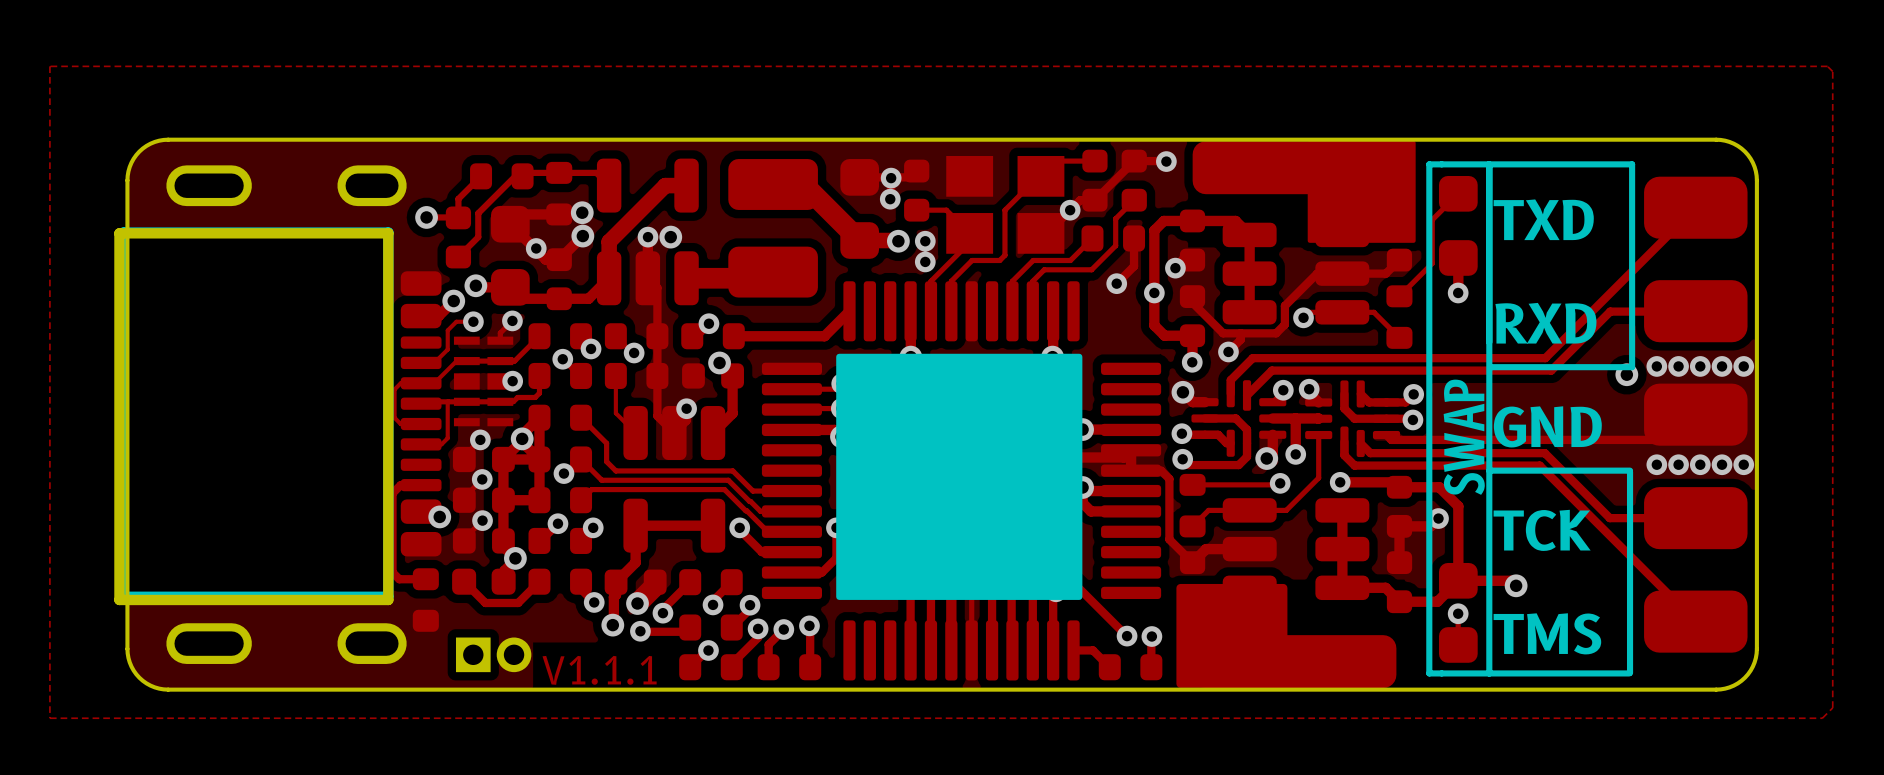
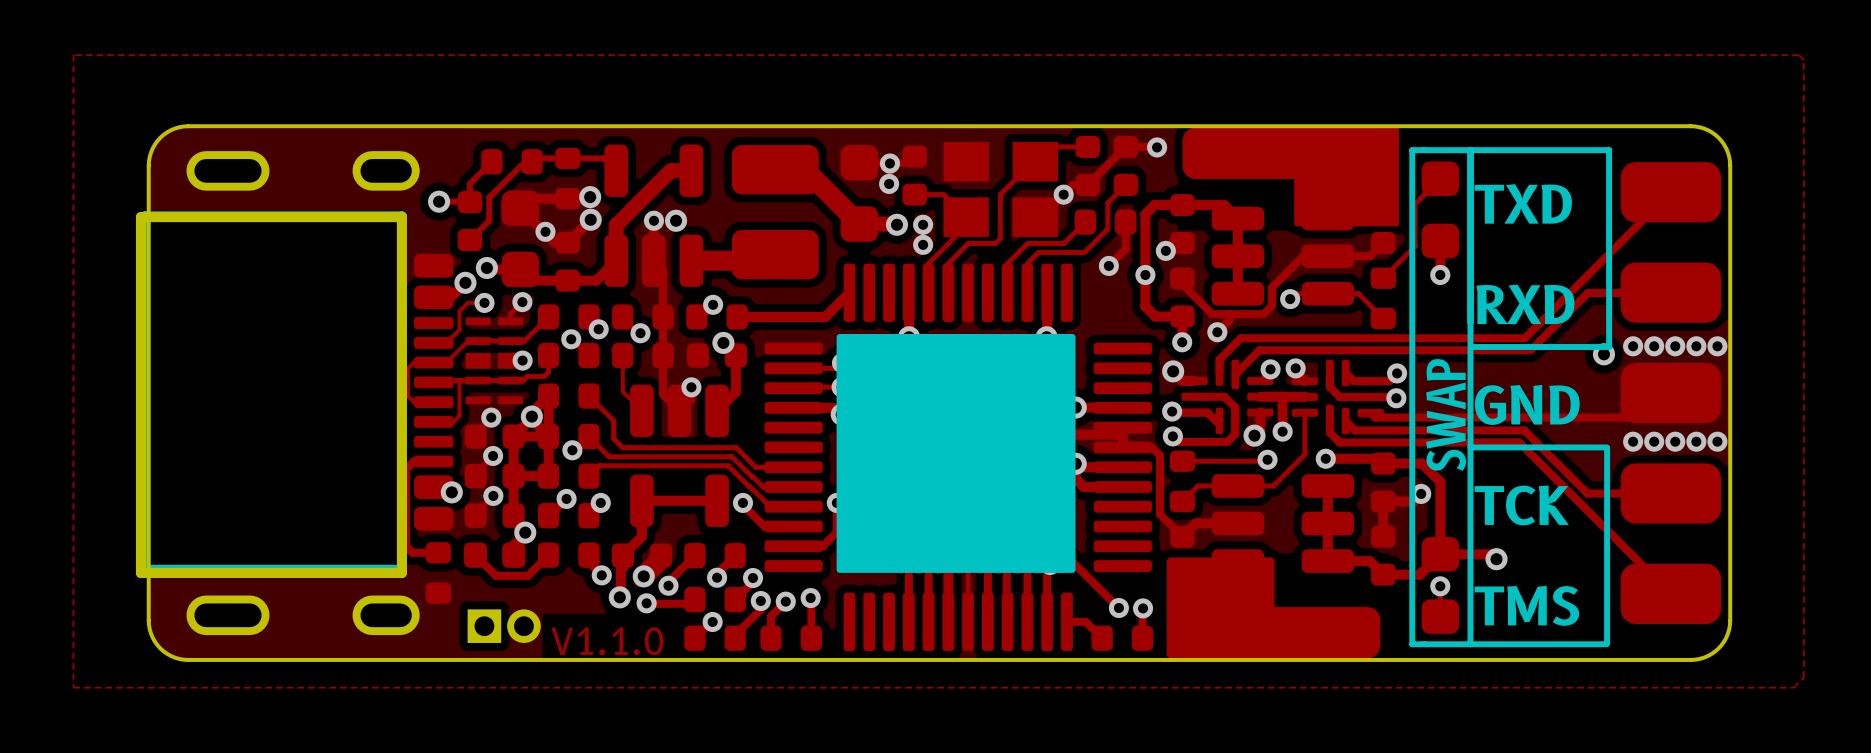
text: V1.1.1 (599, 670) -> V1.1.0 (607, 641)

